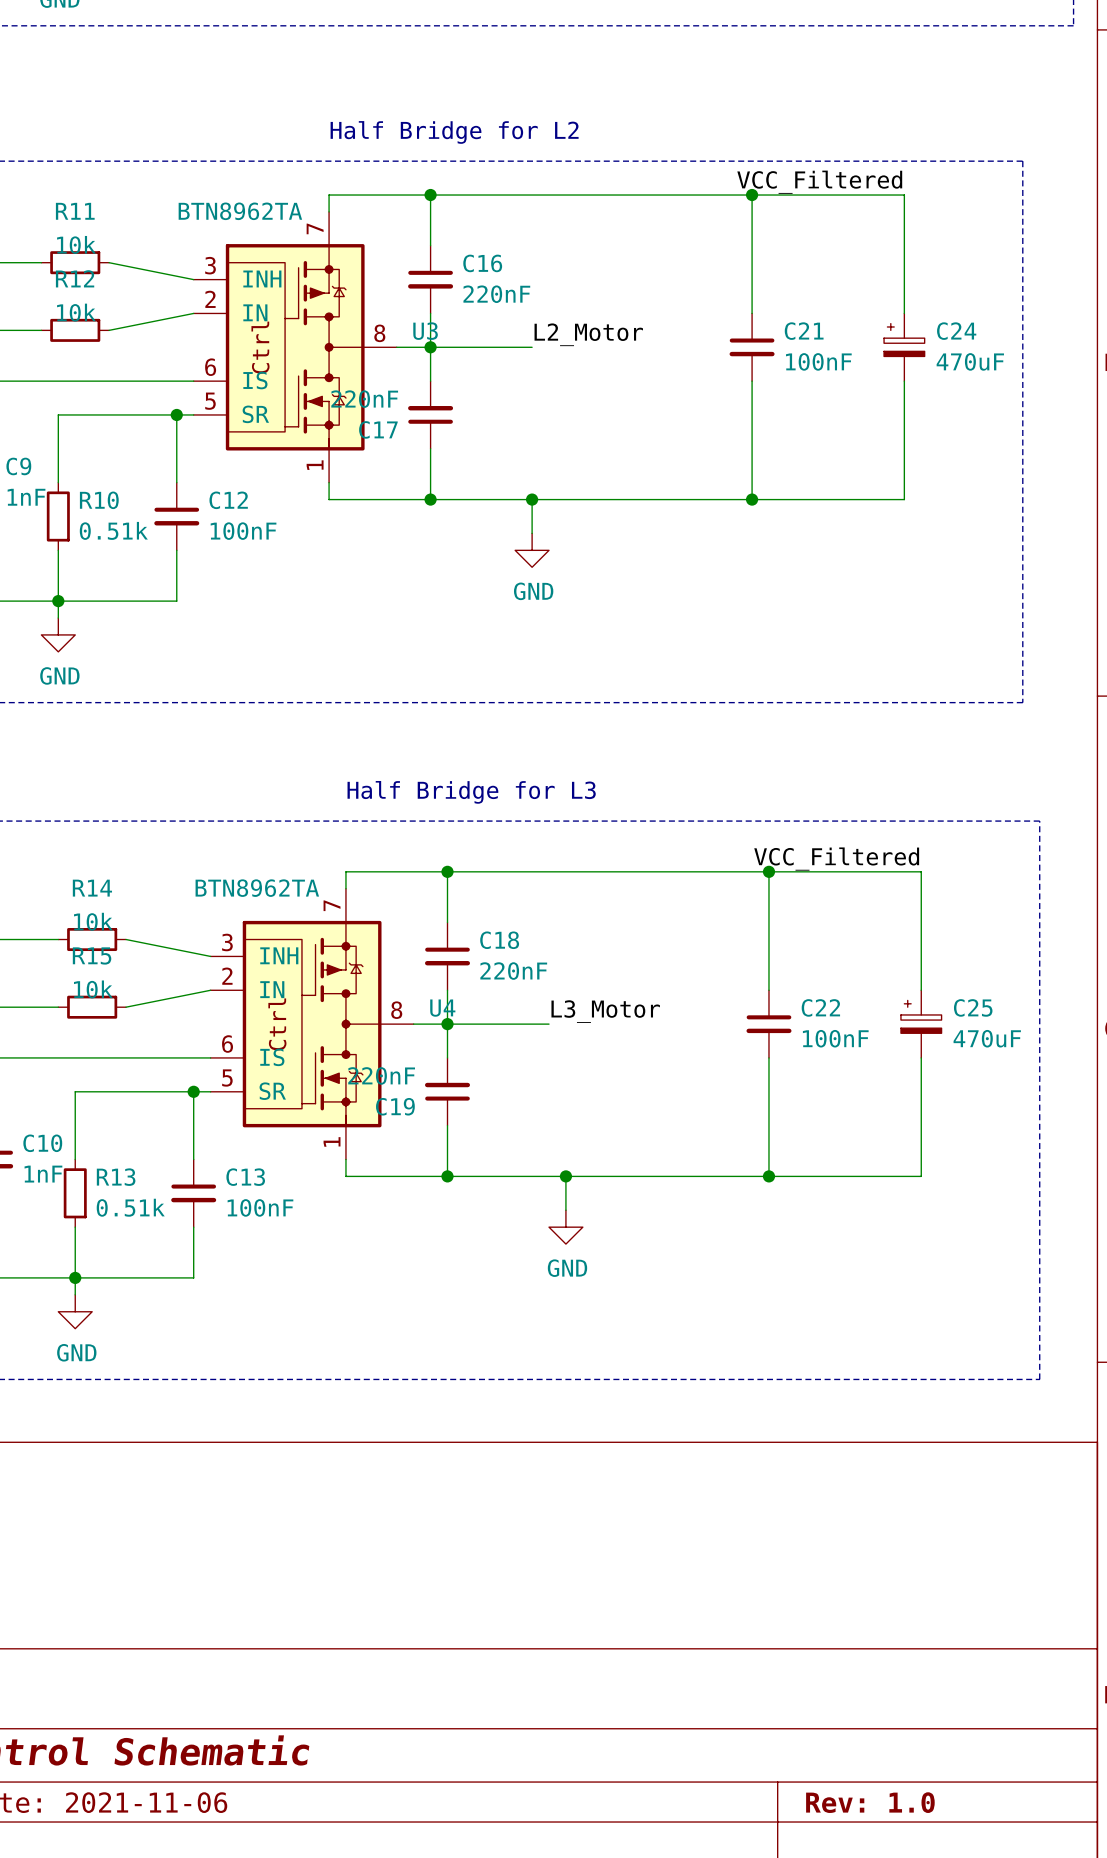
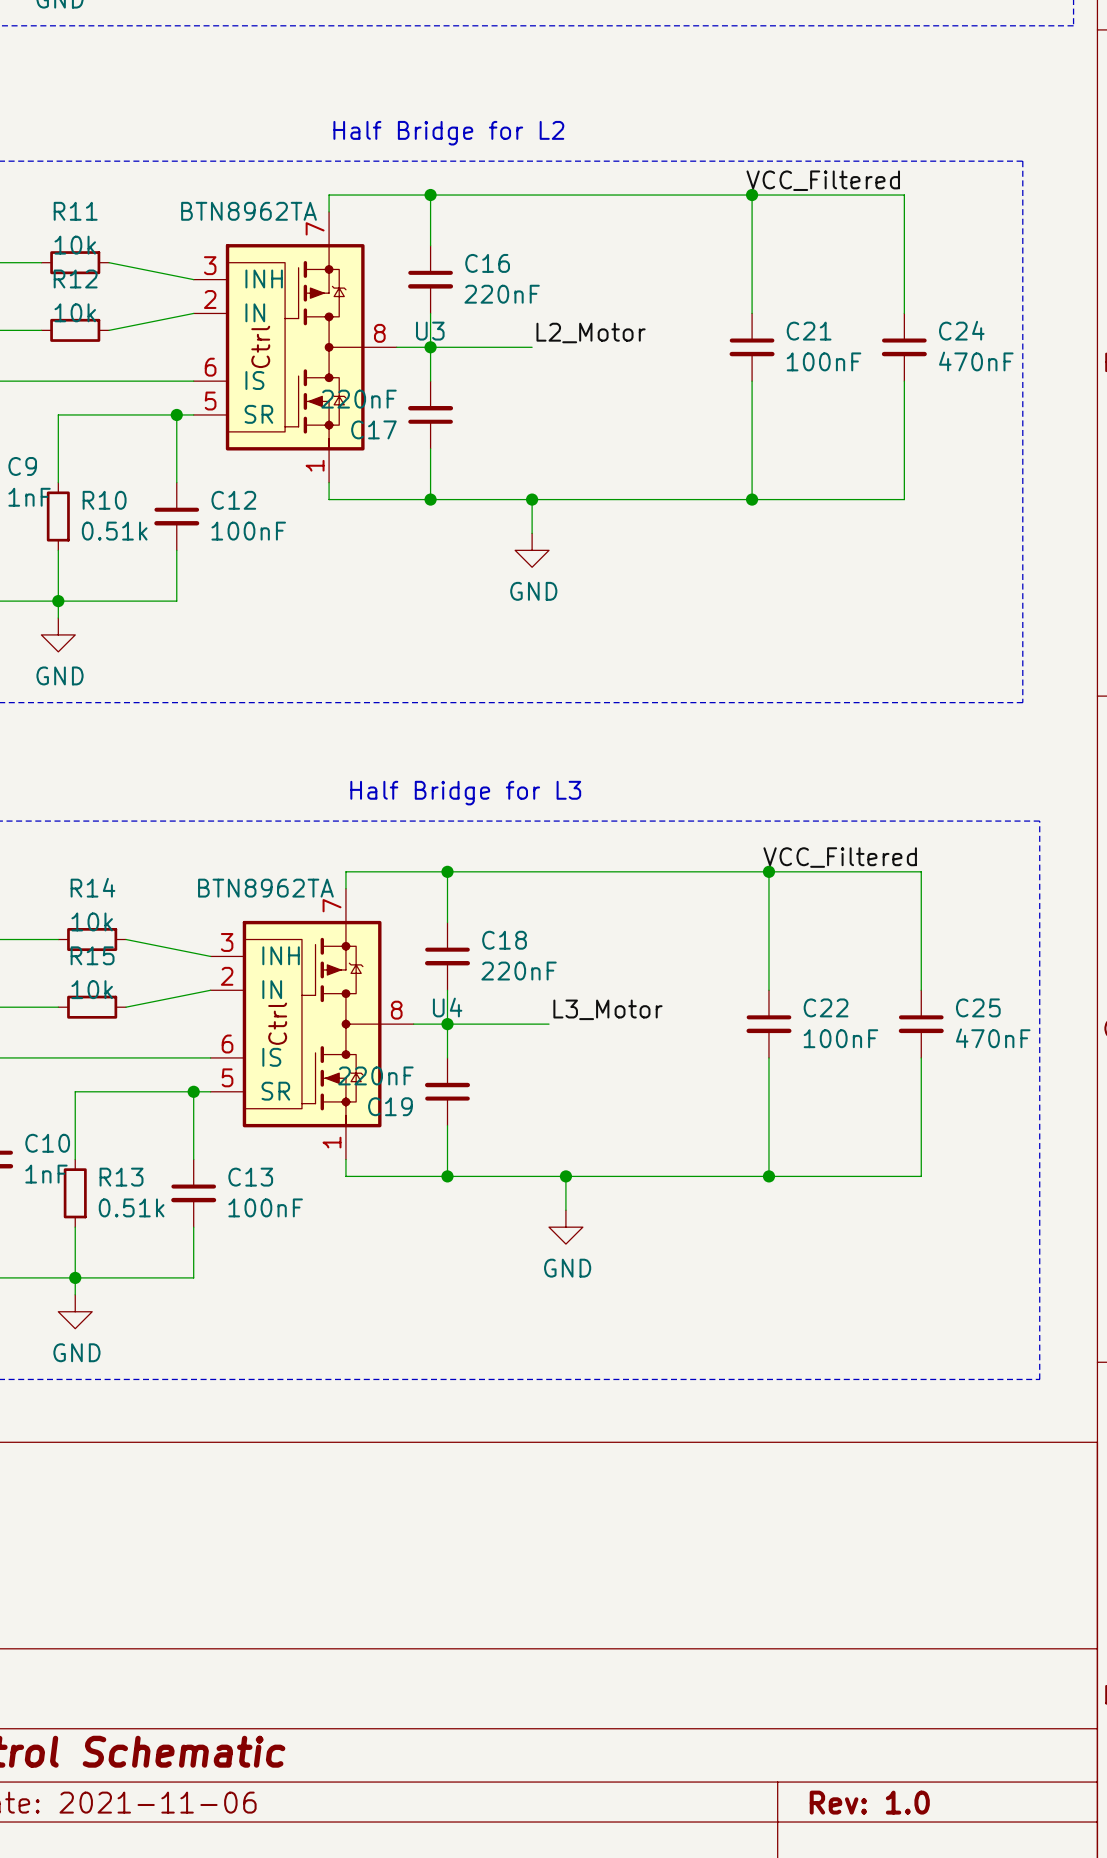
C24 symbol: [884, 313, 925, 382] -> [881, 313, 927, 382]
C24 value: 470uF (970, 361) -> 470nF (976, 361)
C25 symbol: [900, 990, 942, 1058] -> [898, 990, 944, 1058]
C25 value: 470uF (987, 1038) -> 470nF (993, 1038)

